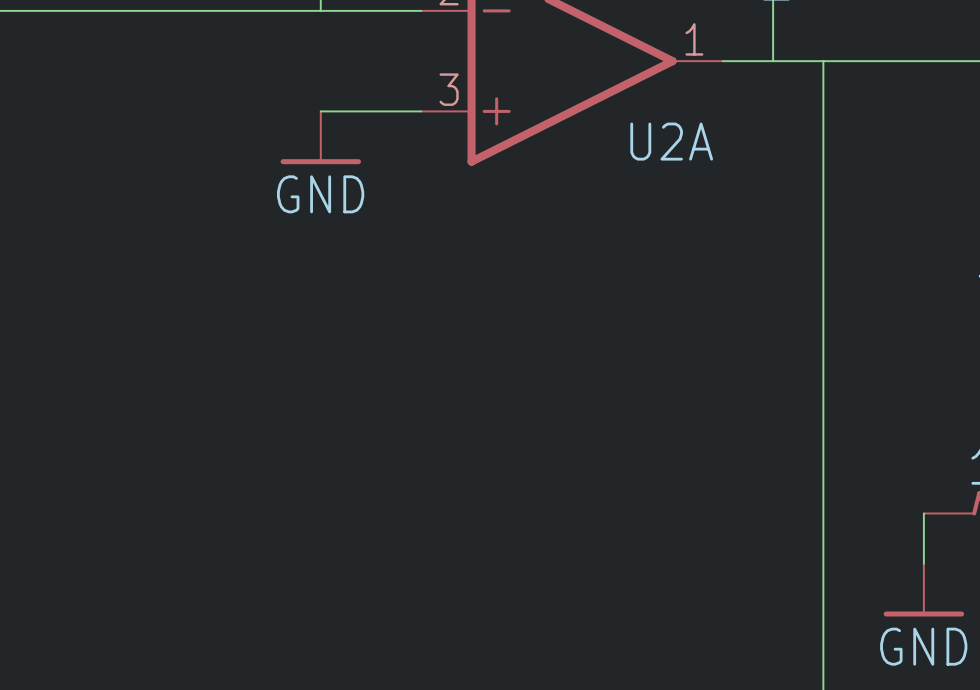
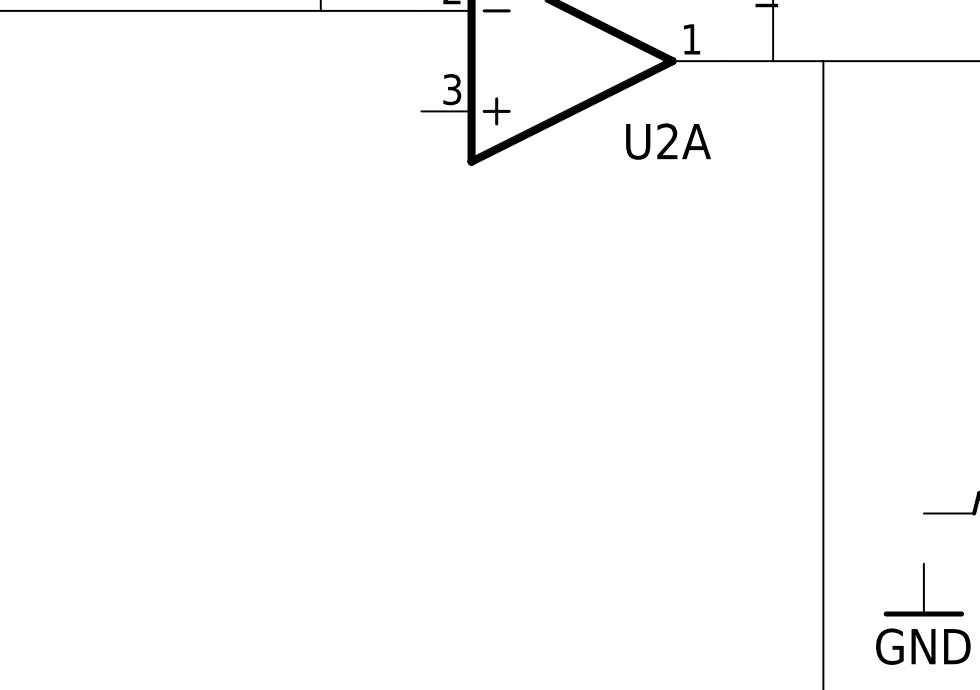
wire: (320, 111) (421, 111) -> none
power symbol: GND (320, 137) -> none
wire: (923, 513) (923, 563) -> none

